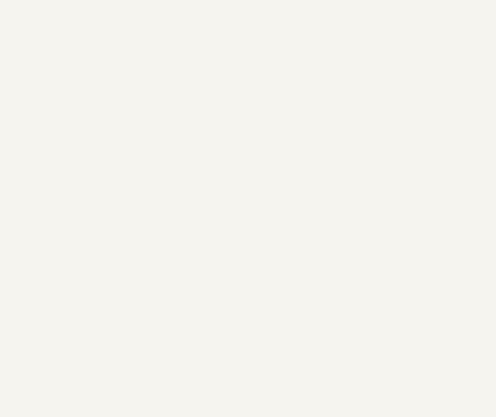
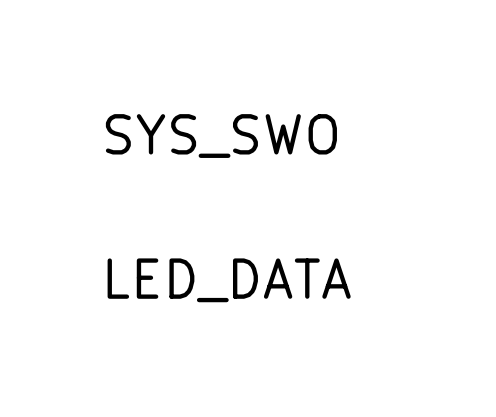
label: none -> SYS_SWO (221, 136)
label: none -> LED_DATA (229, 280)

